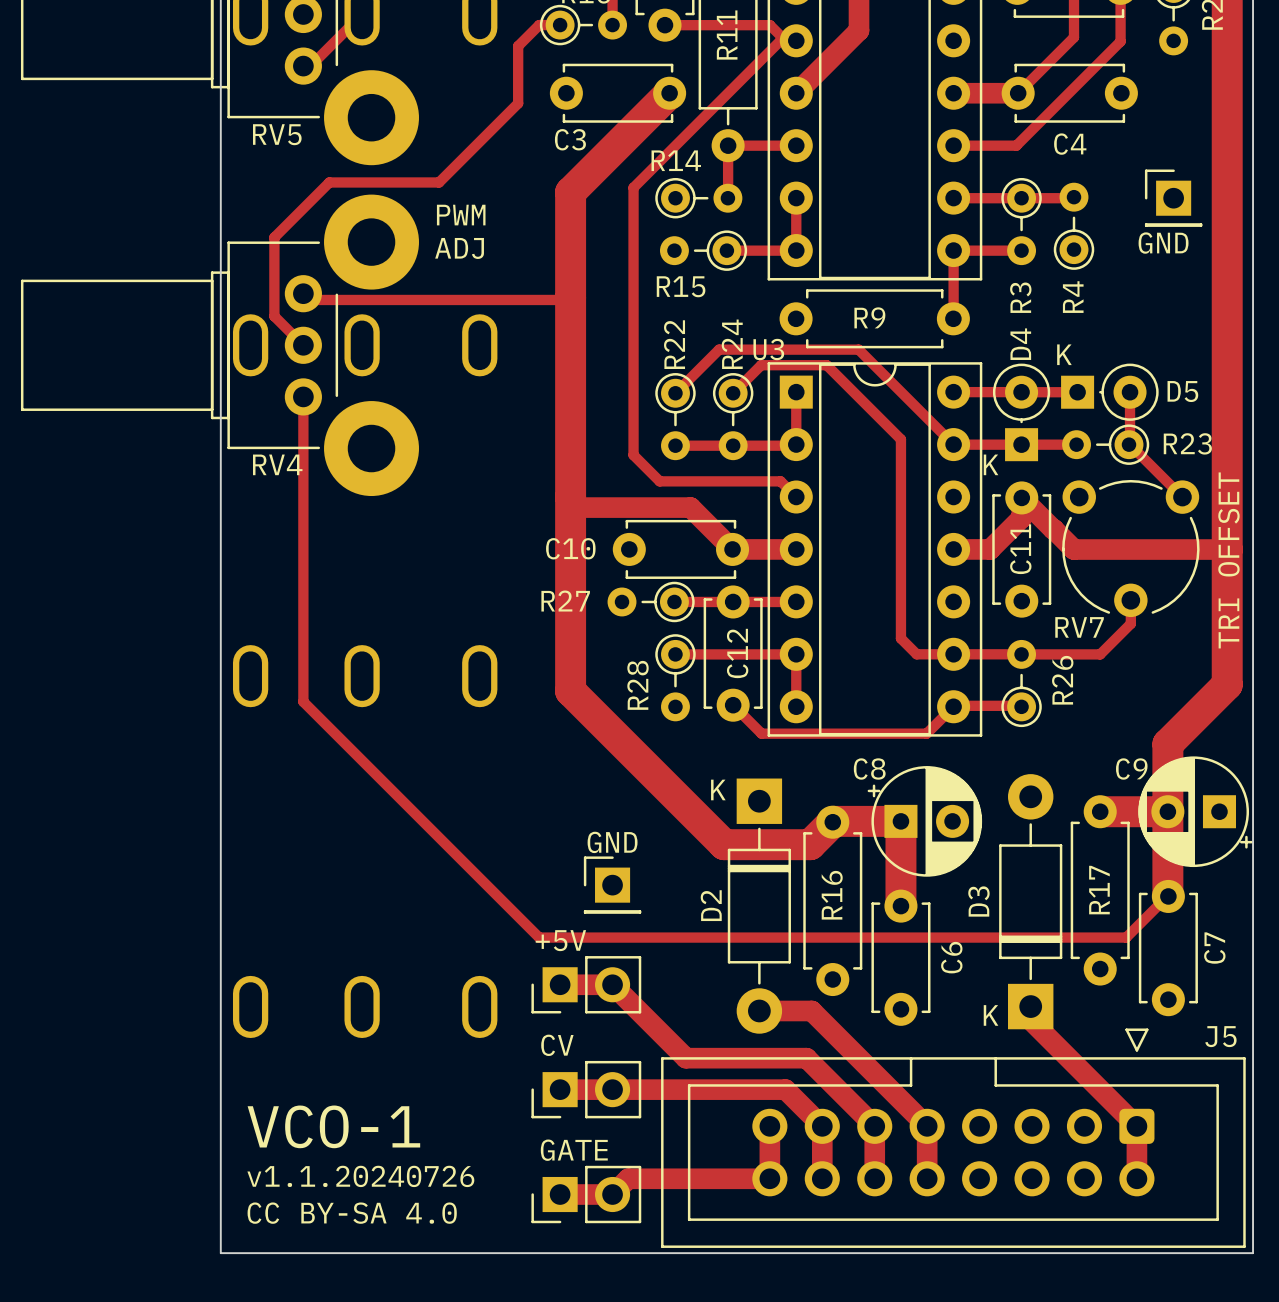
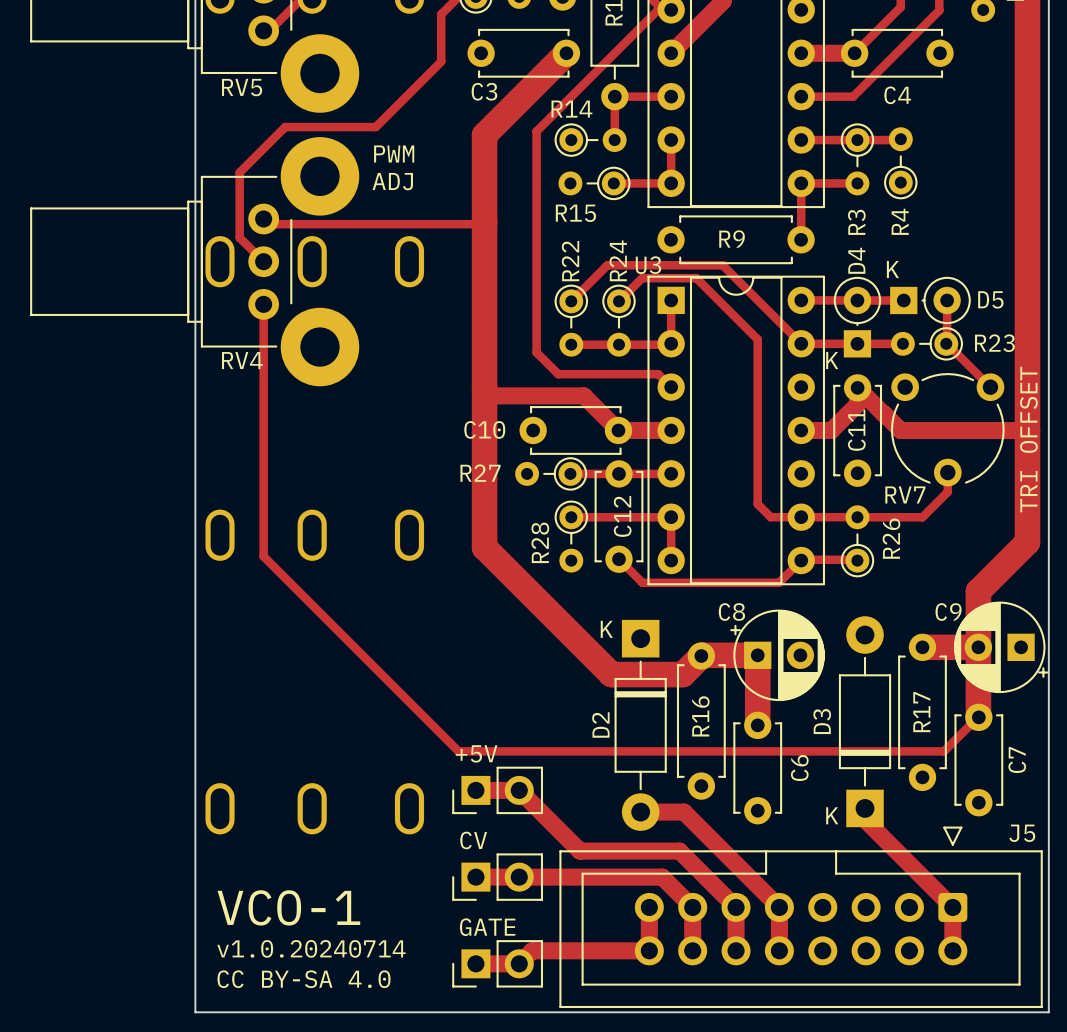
part: (1173, 198) -> none
text: GND (1163, 243) -> none
text: GND (612, 842) -> none
part: (612, 885) -> none
text: v1.1.20240726 (360, 1176) -> v1.0.20240714 (311, 948)

